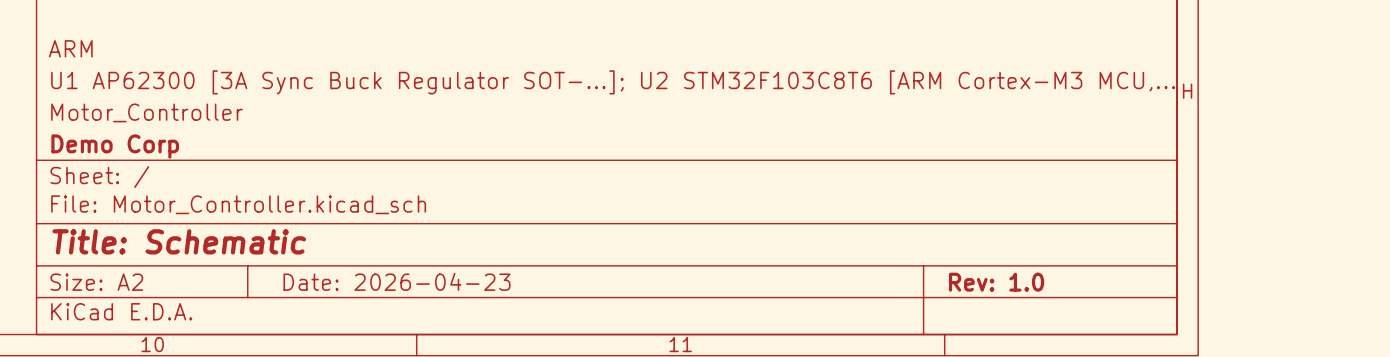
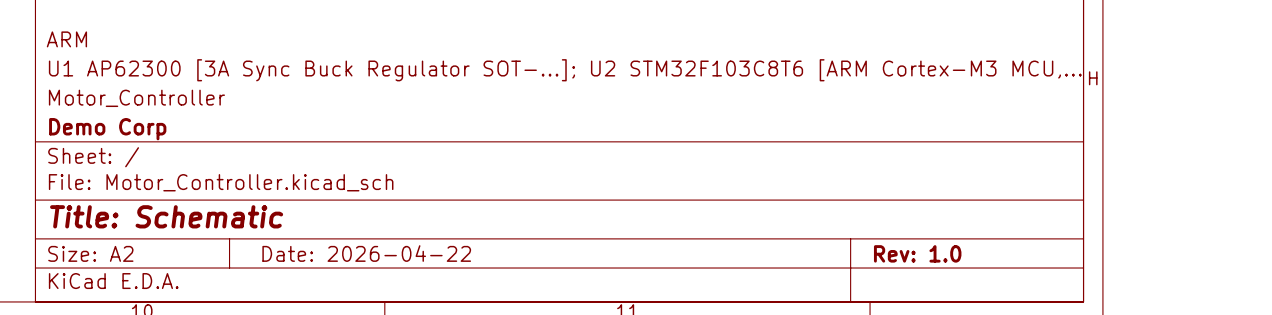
title block: Date: 2026-04-23 (397, 281) -> Date: 2026-04-22 (366, 253)

